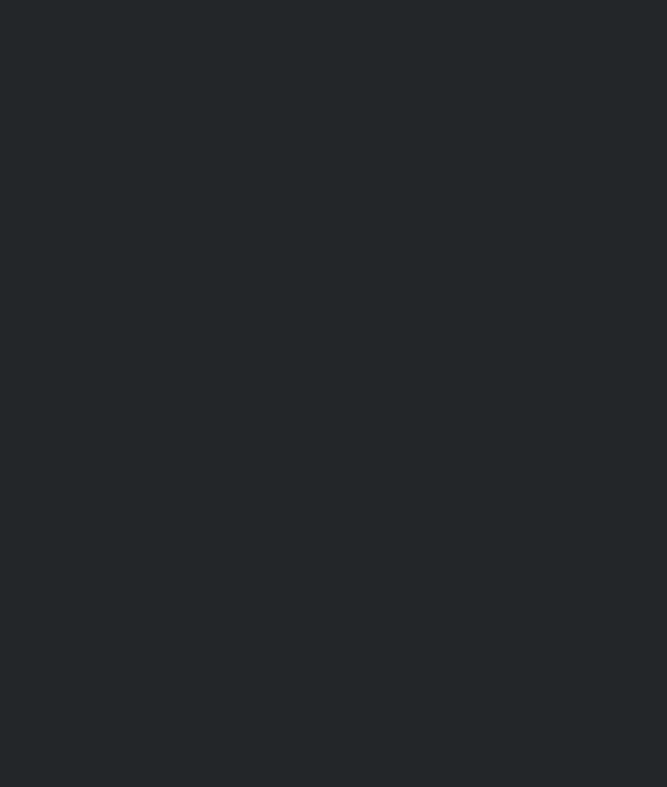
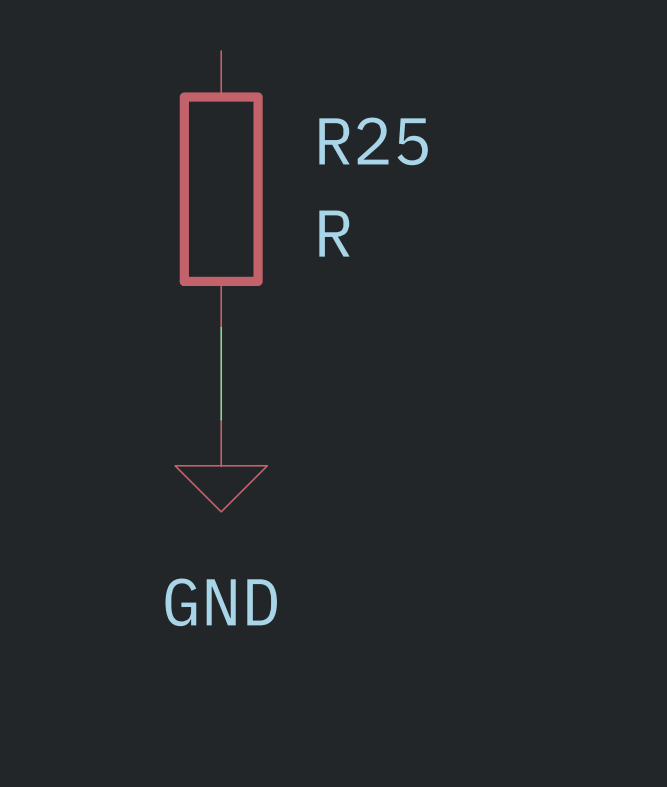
R25: none -> R (221, 189)
wire: none -> (221, 327) (221, 419)
power symbol: none -> GND (221, 465)

